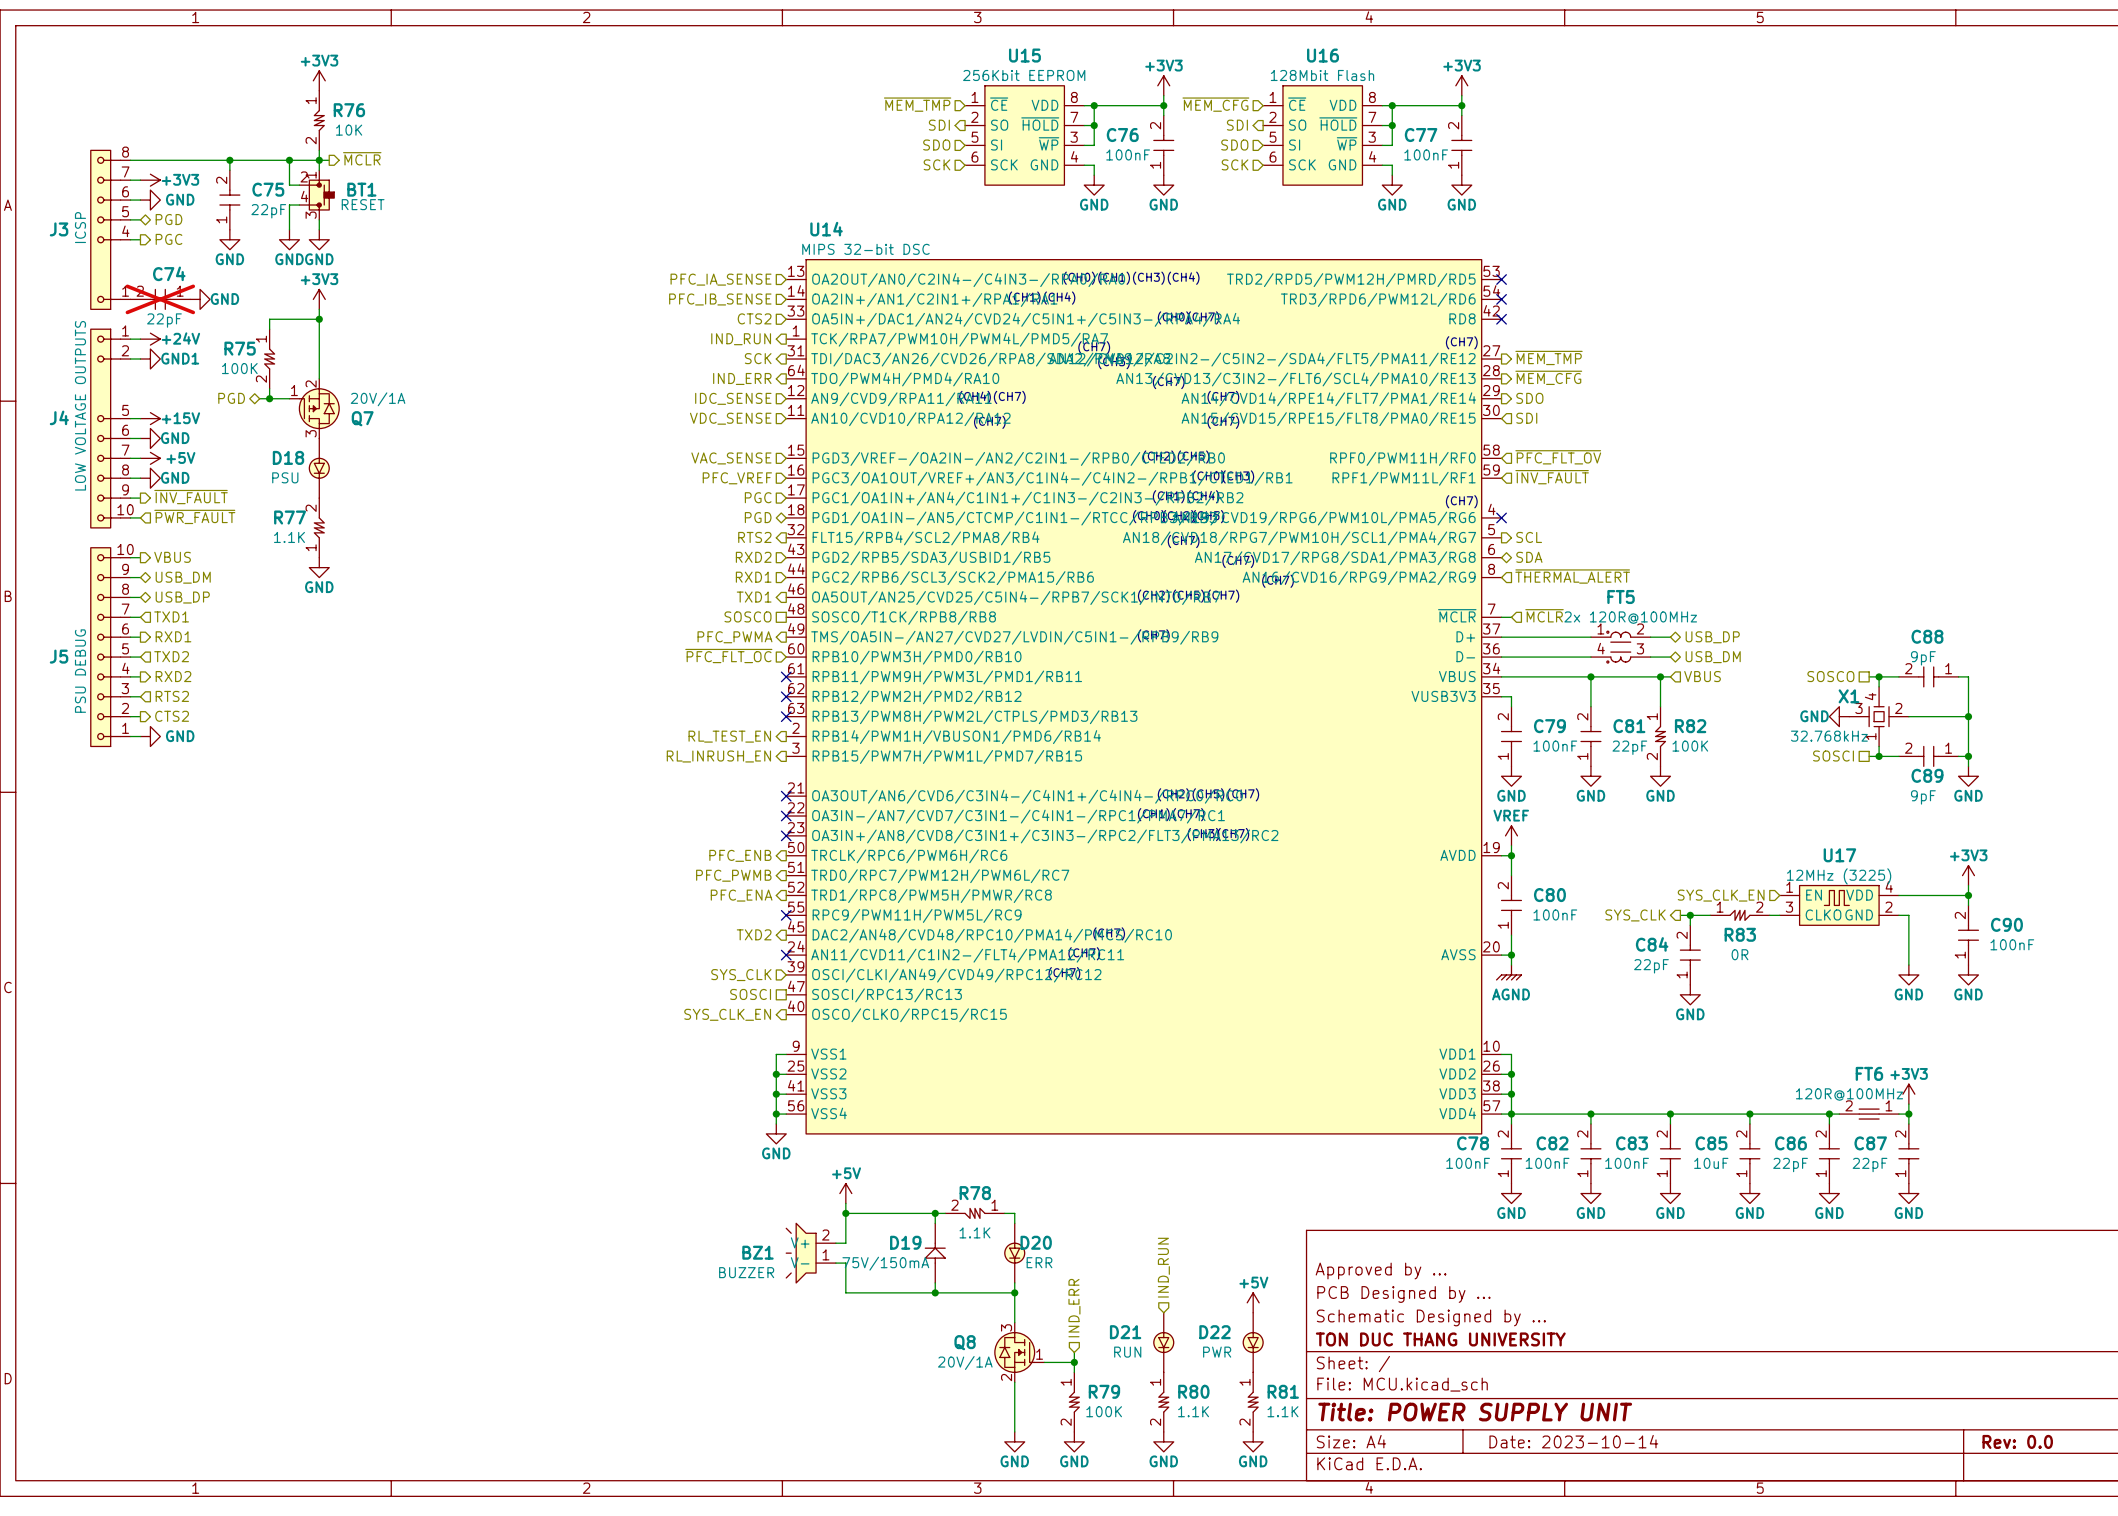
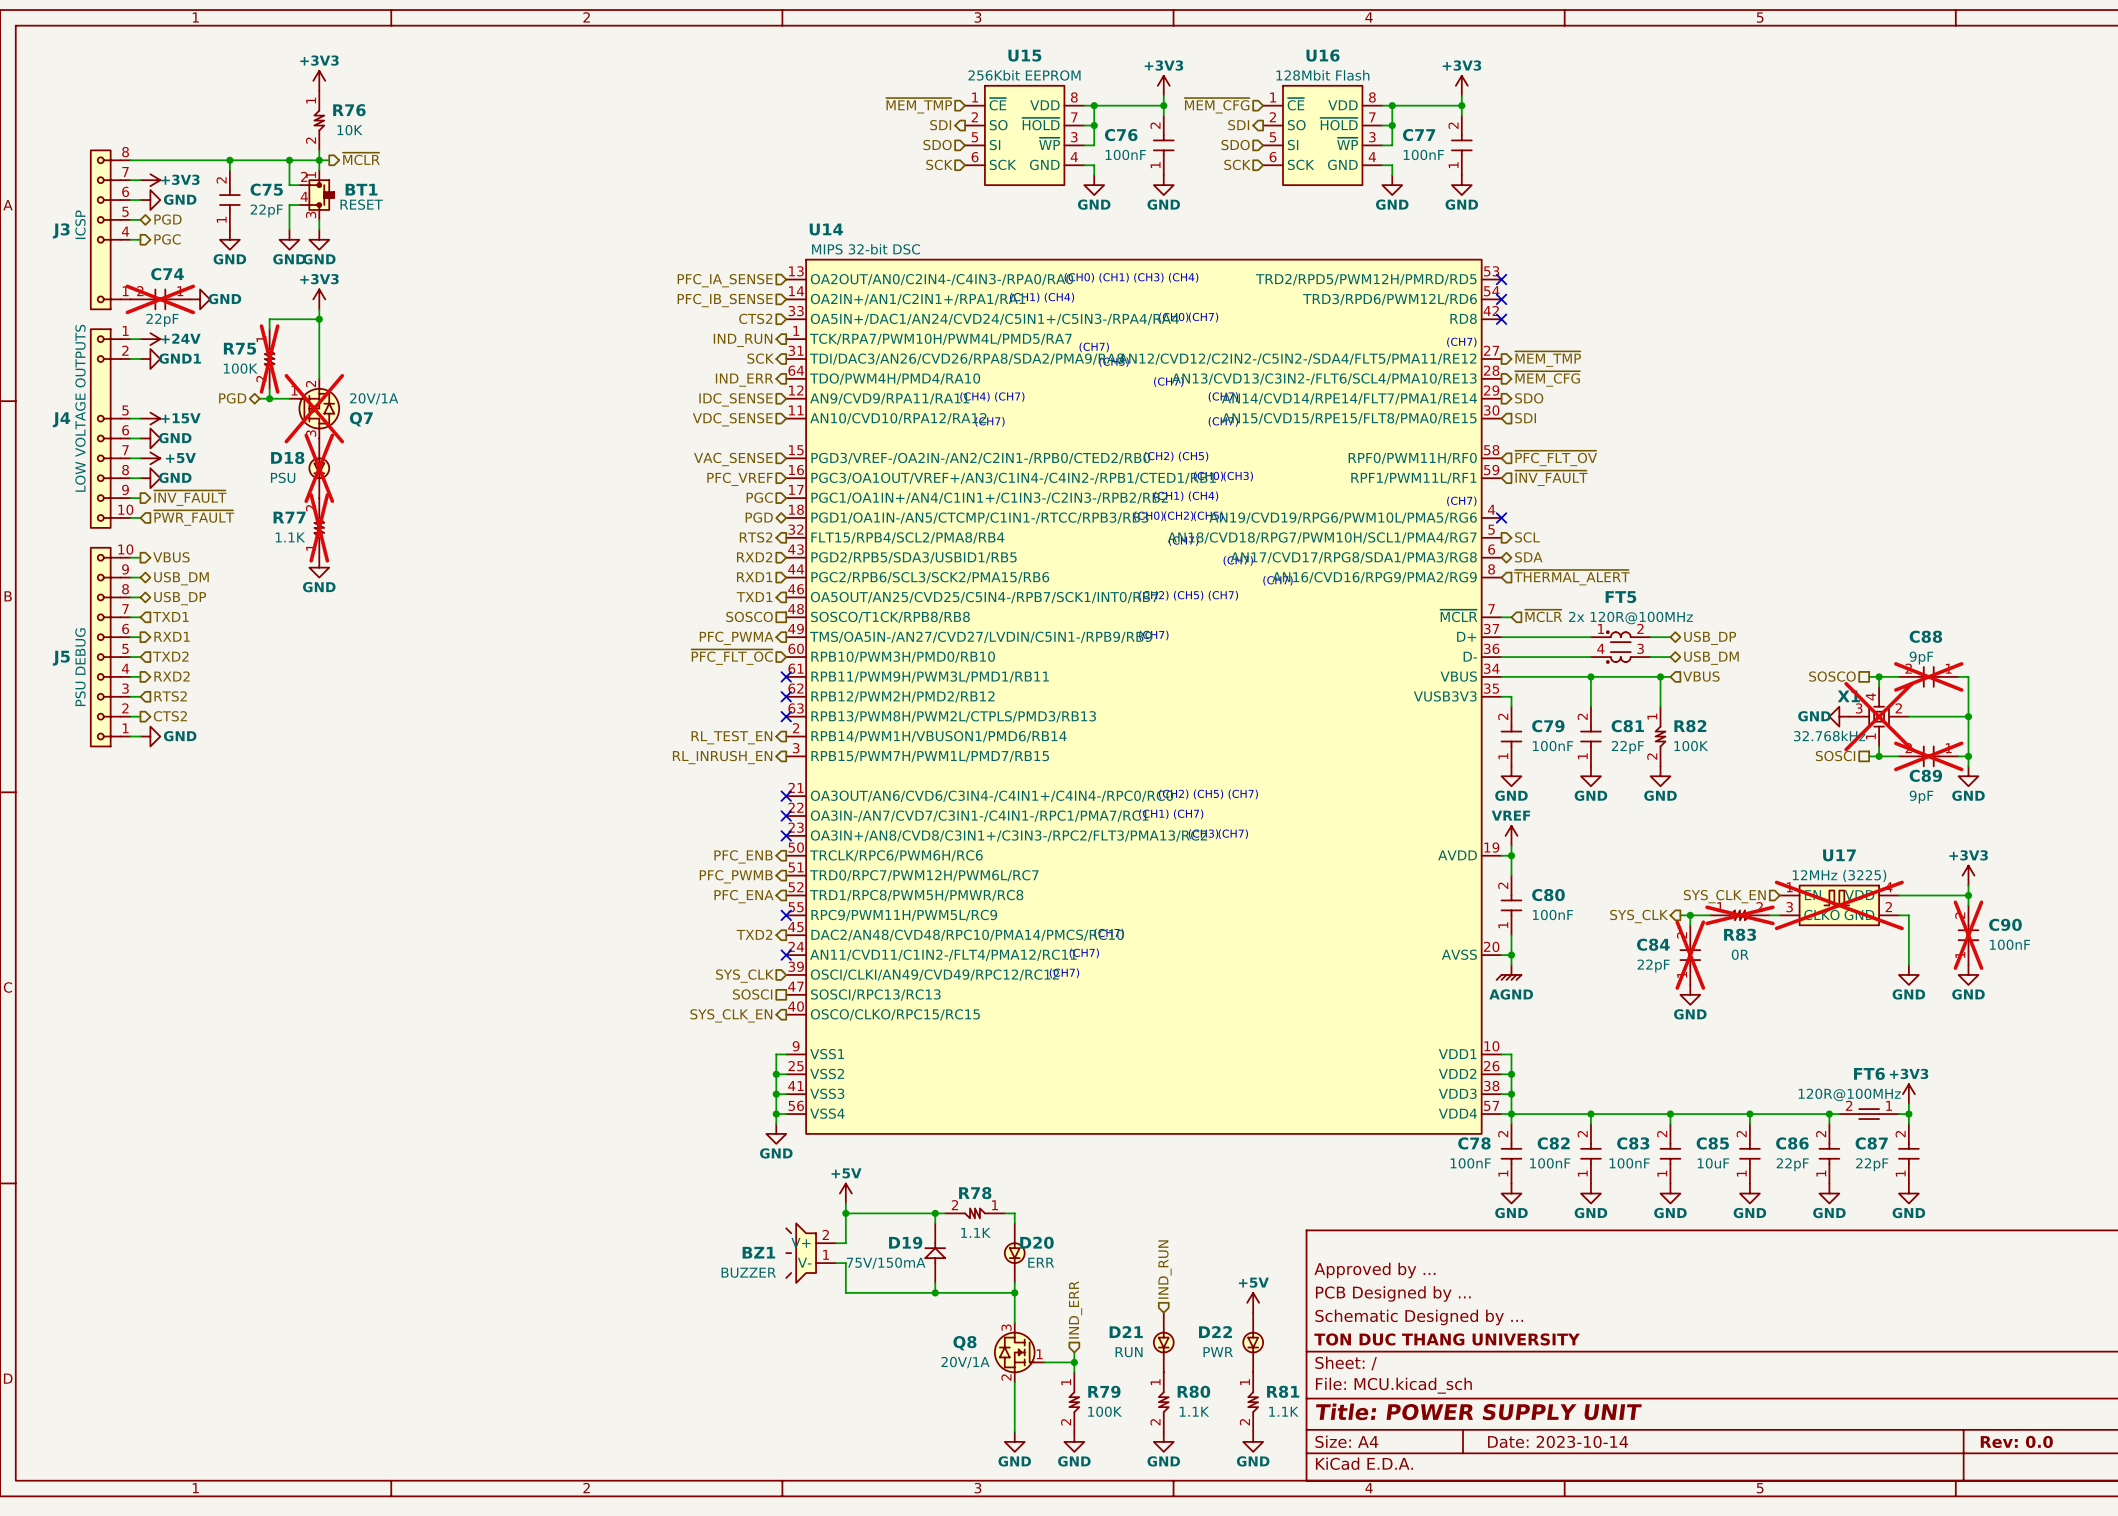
R75 do-not-place cross: none -> (269, 359)
Q7 do-not-place cross: none -> (314, 408)
D18 do-not-place cross: none -> (319, 468)
R77 do-not-place cross: none -> (319, 527)
C88 do-not-place cross: none -> (1928, 676)
X1 do-not-place cross: none -> (1879, 716)
C89 do-not-place cross: none -> (1928, 756)
U17 do-not-place cross: none -> (1839, 905)
R83 do-not-place cross: none -> (1739, 915)
C90 do-not-place cross: none -> (1968, 935)
C84 do-not-place cross: none -> (1690, 955)

